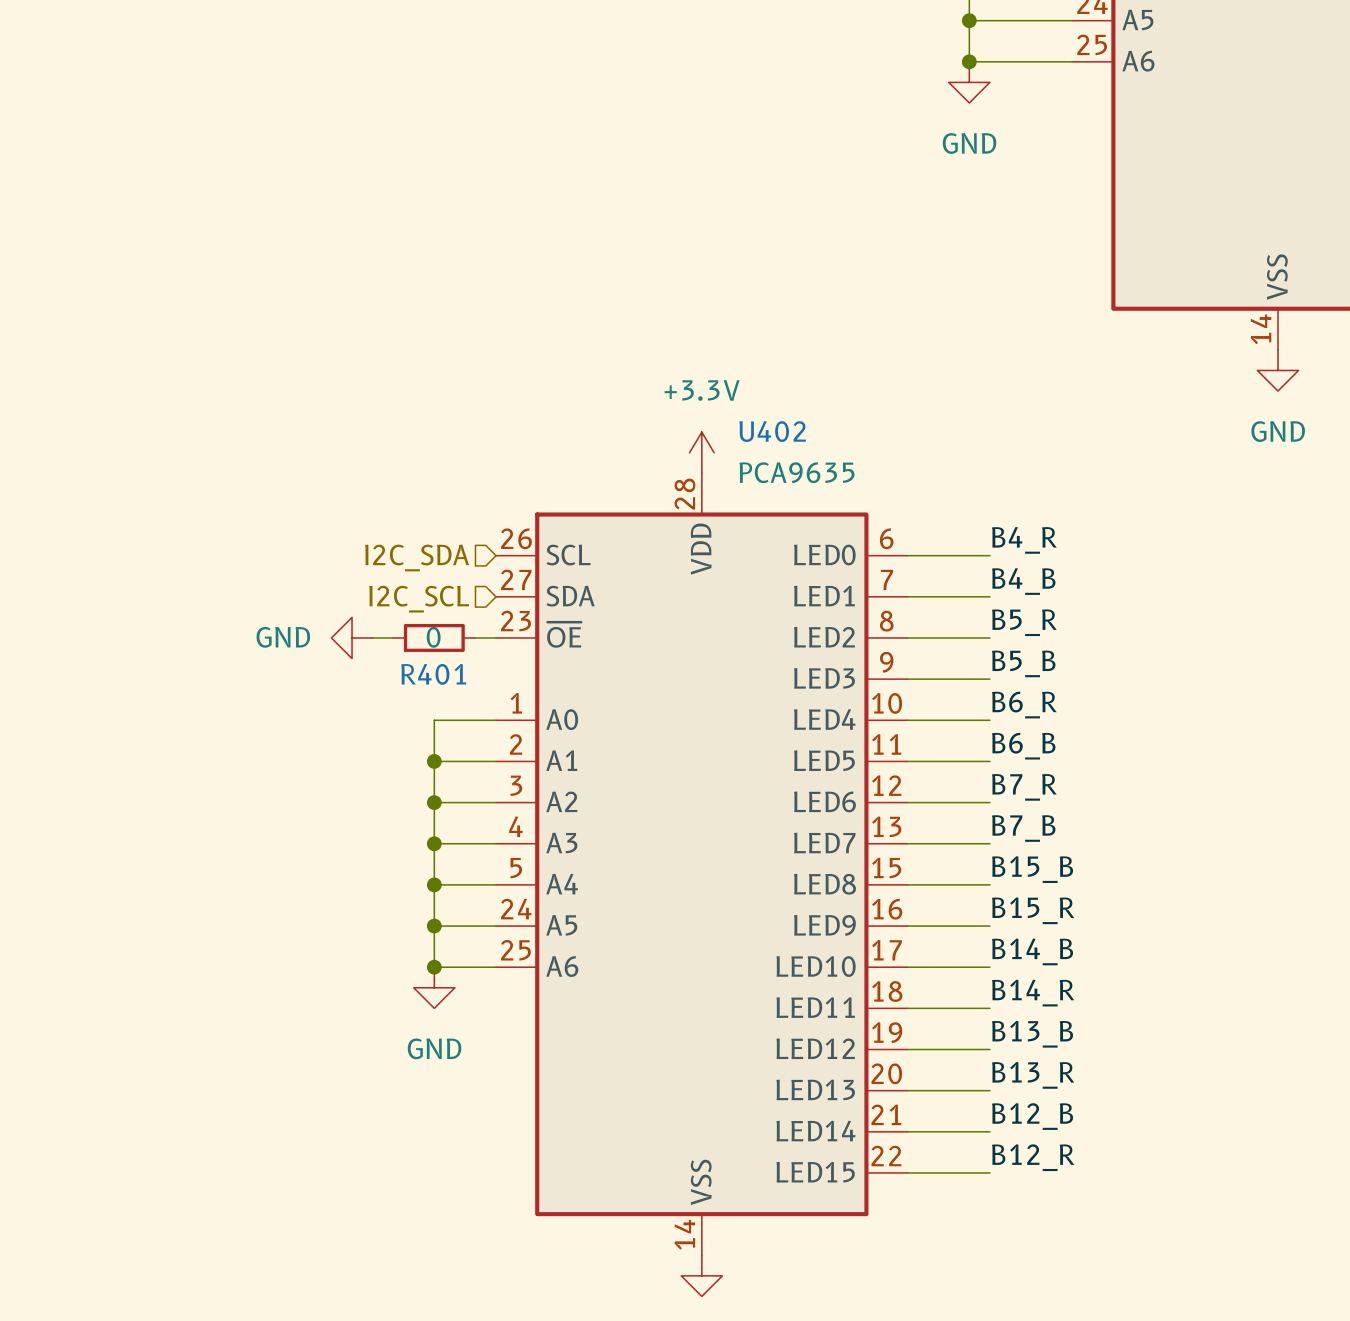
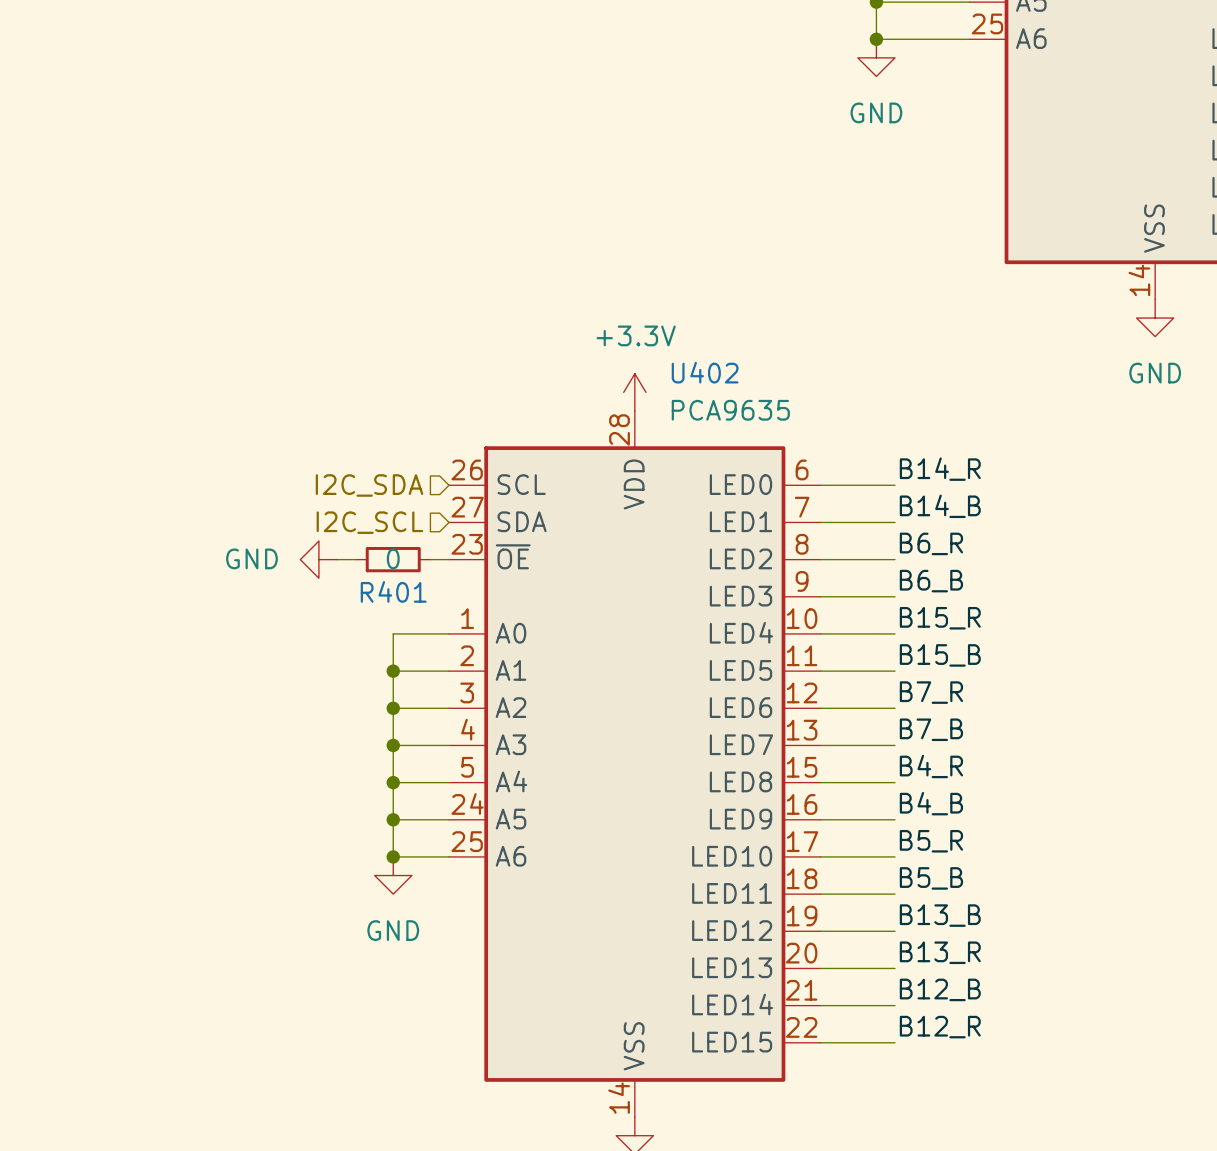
label: B4_R (1024, 540) -> B14_R (940, 469)
label: B4_B (1023, 581) -> B14_B (940, 506)
label: B5_R (1024, 622) -> B6_R (931, 543)
label: B5_B (1023, 663) -> B6_B (931, 581)
label: B6_R (1024, 705) -> B15_R (940, 618)
label: B6_B (1023, 746) -> B15_B (940, 655)
label: B15_B (1032, 869) -> B4_R (931, 766)
label: B15_R (1033, 910) -> B4_B (931, 803)
label: B14_B (1032, 951) -> B5_R (931, 841)
label: B14_R (1033, 993) -> B5_B (931, 878)

